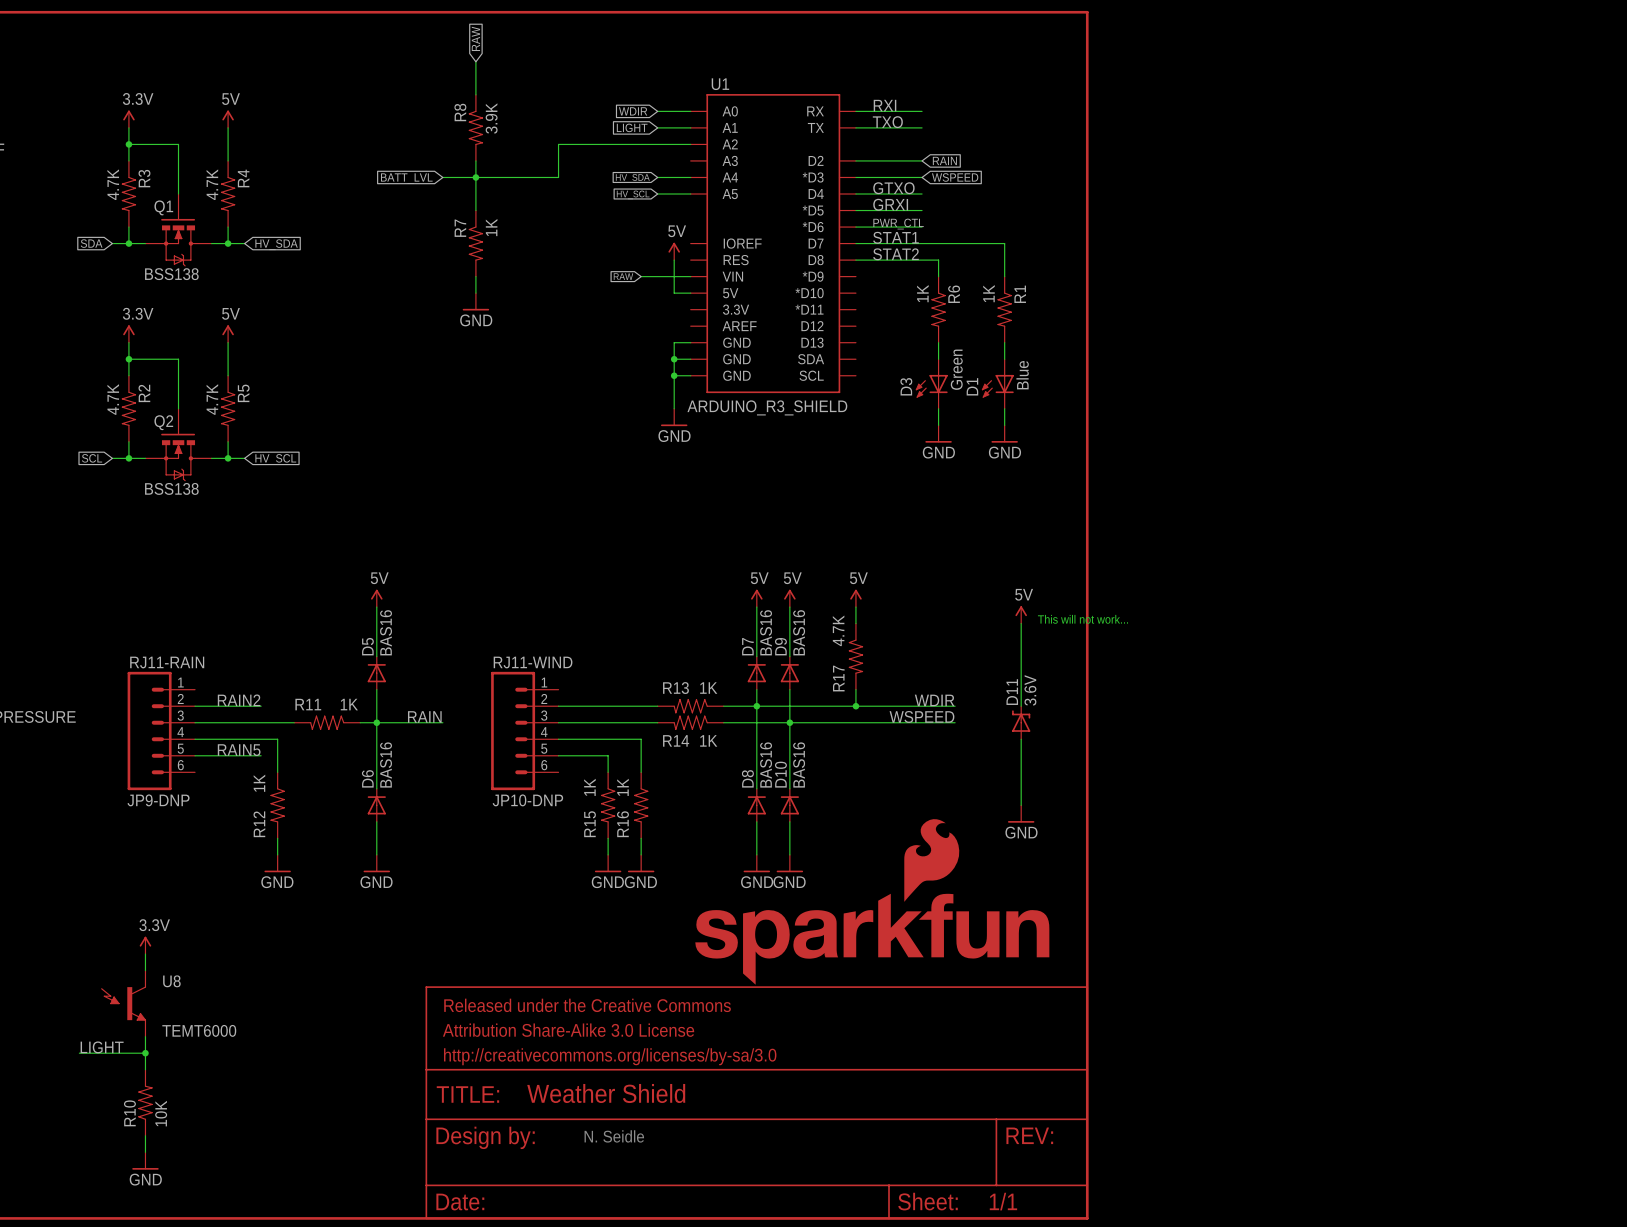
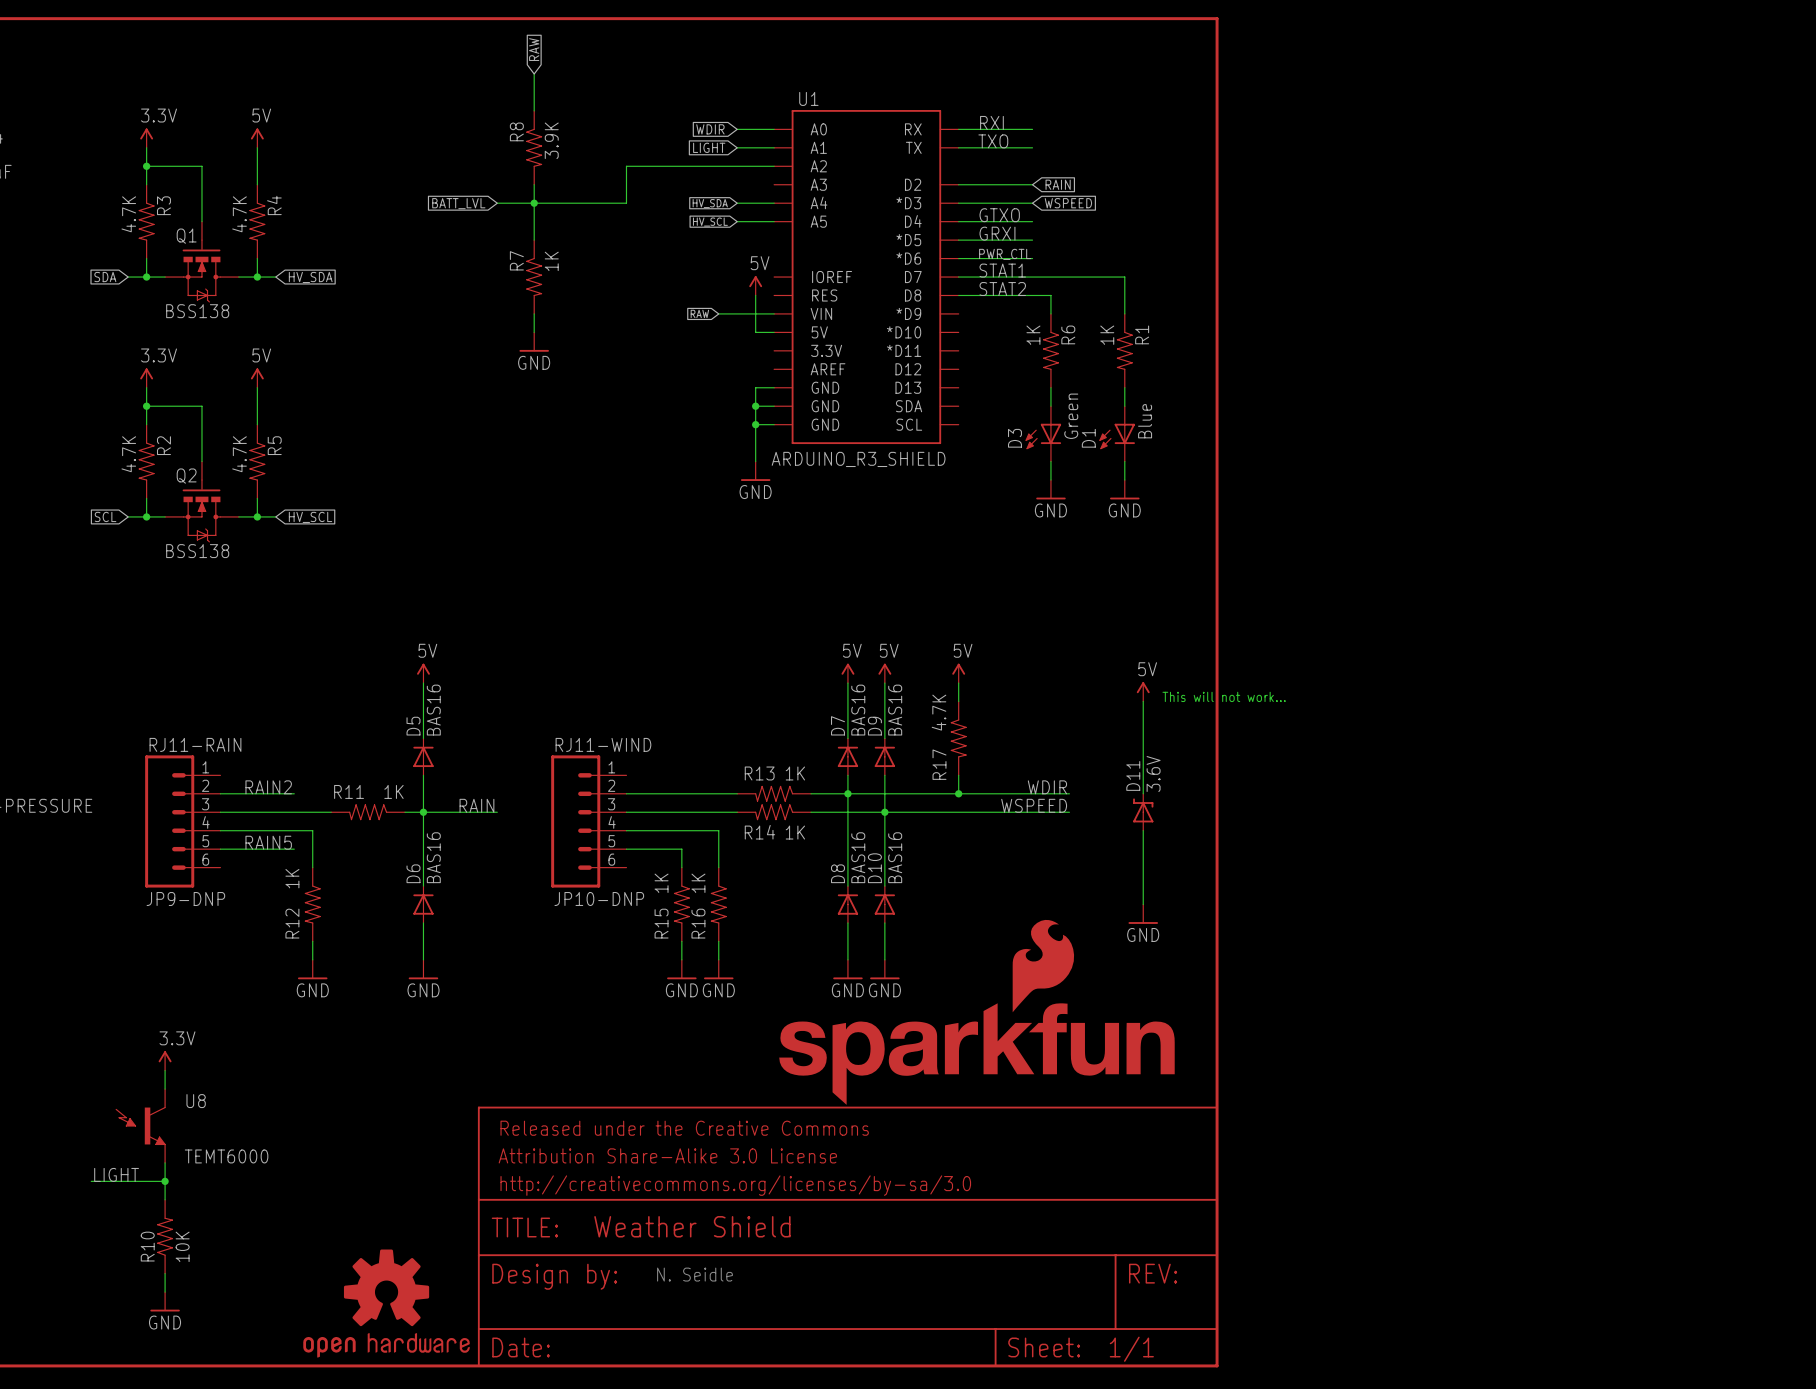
part: none -> (386, 1303)

